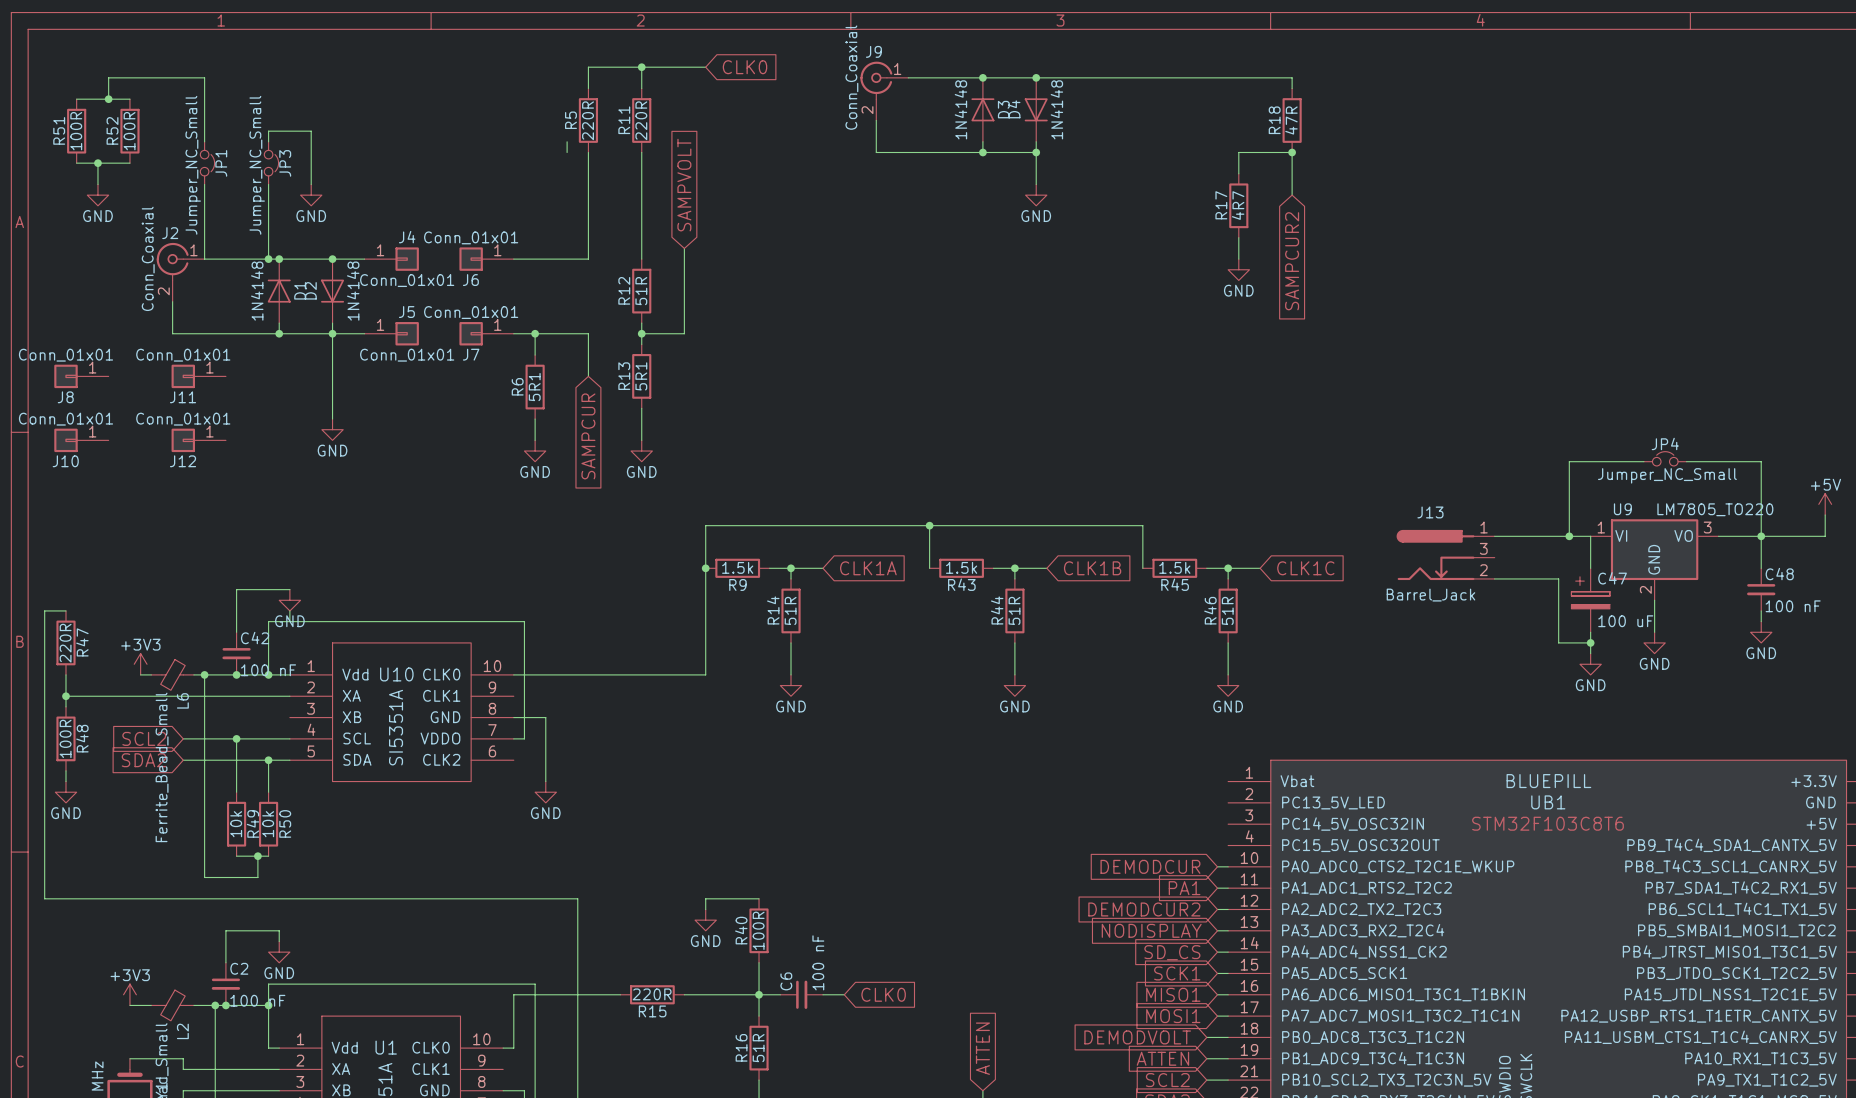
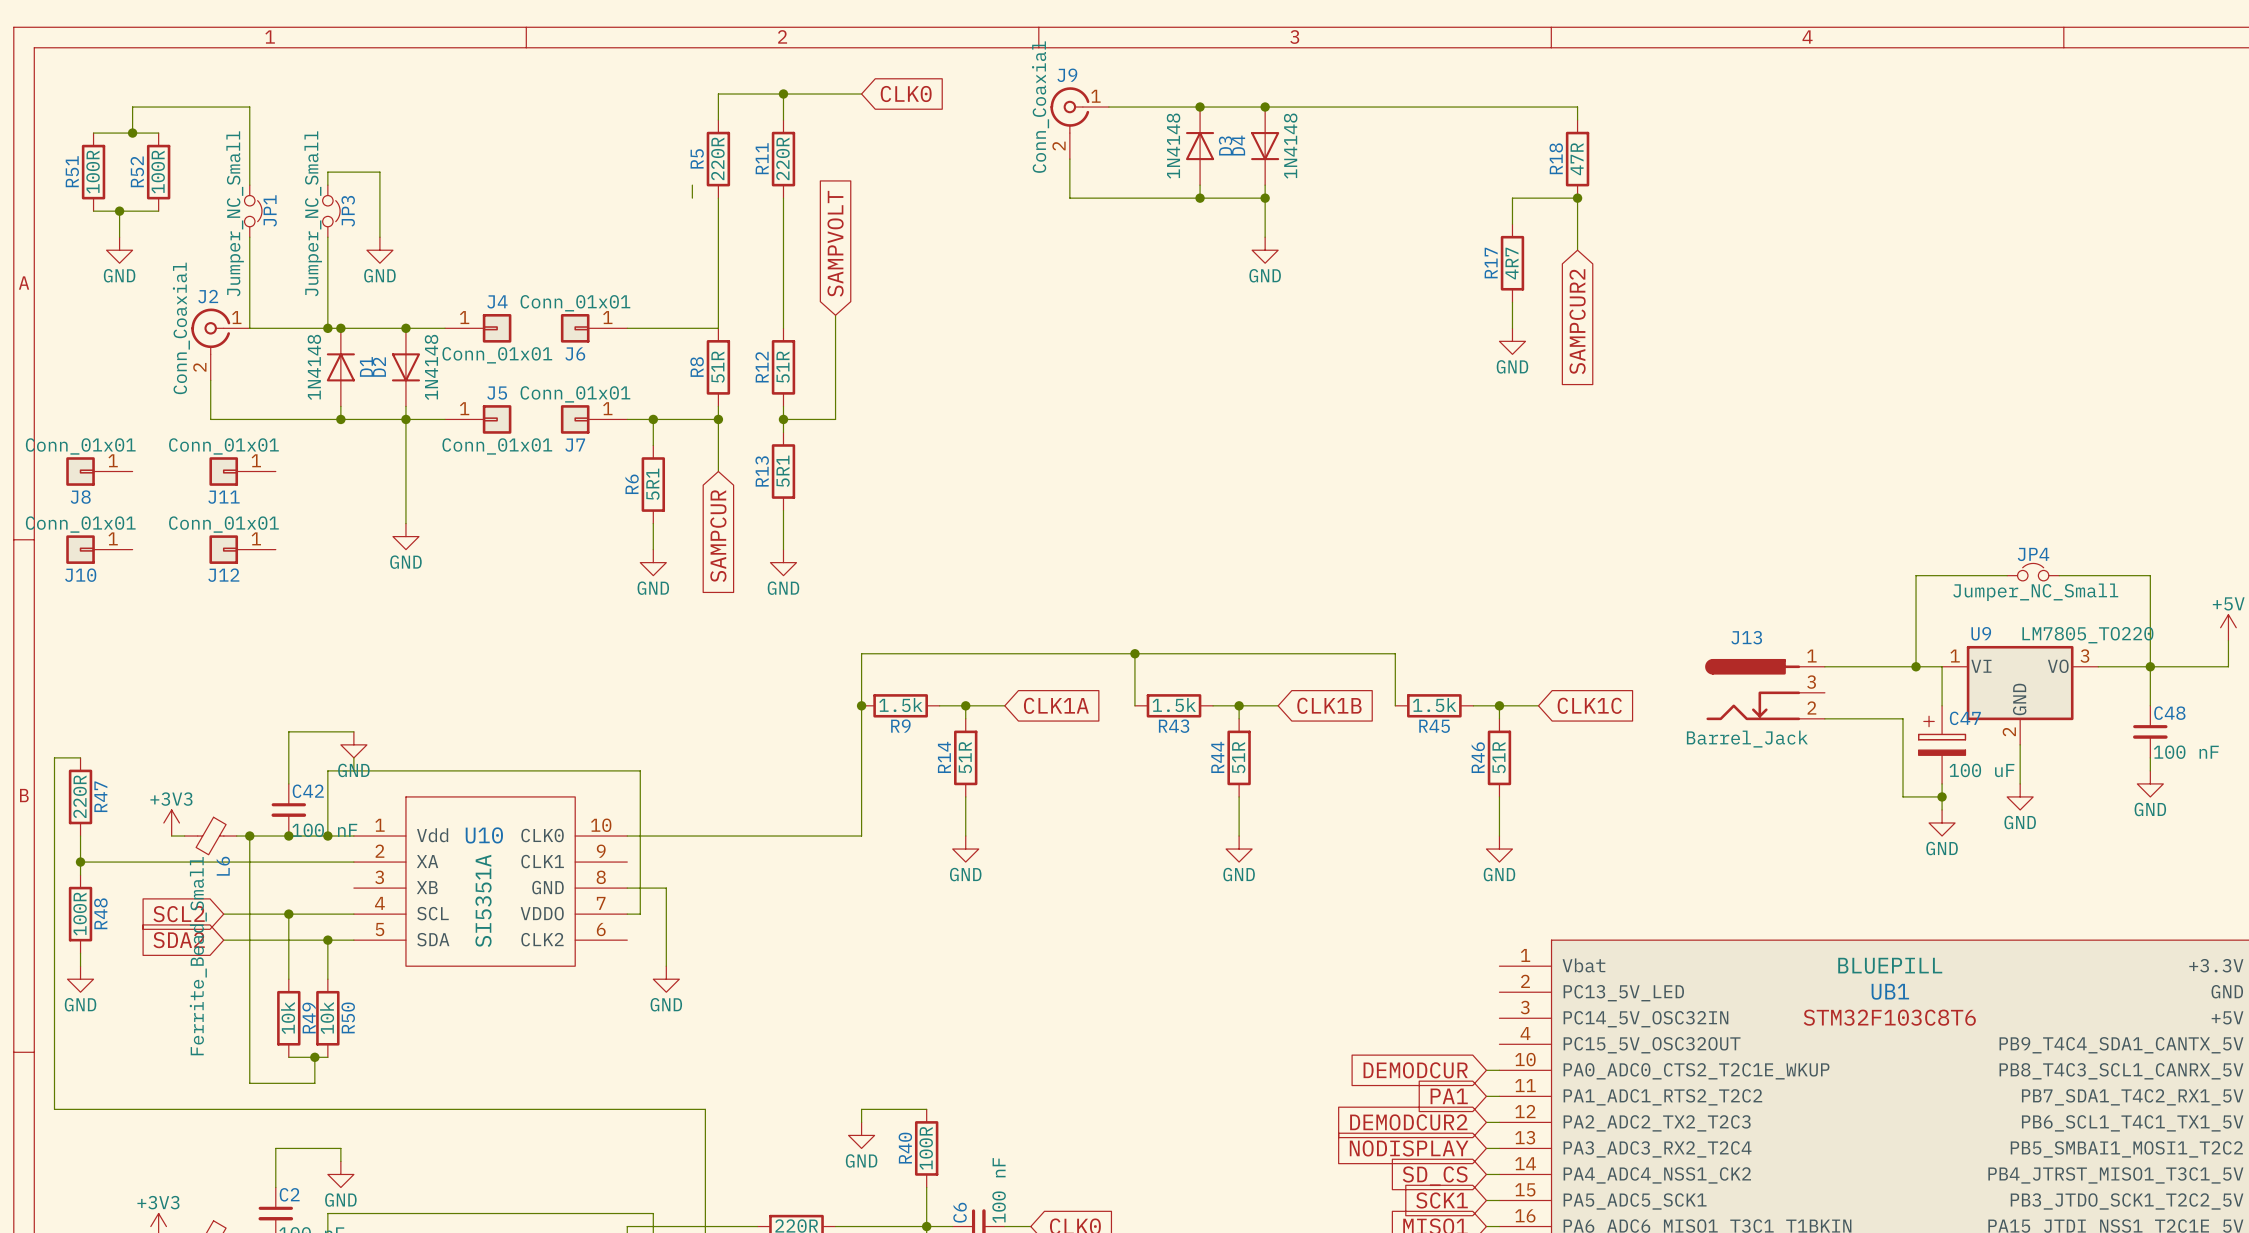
R8: none -> 51R (718, 367)
wire: none -> (718, 406) (718, 419)
junction: none -> (718, 419)

